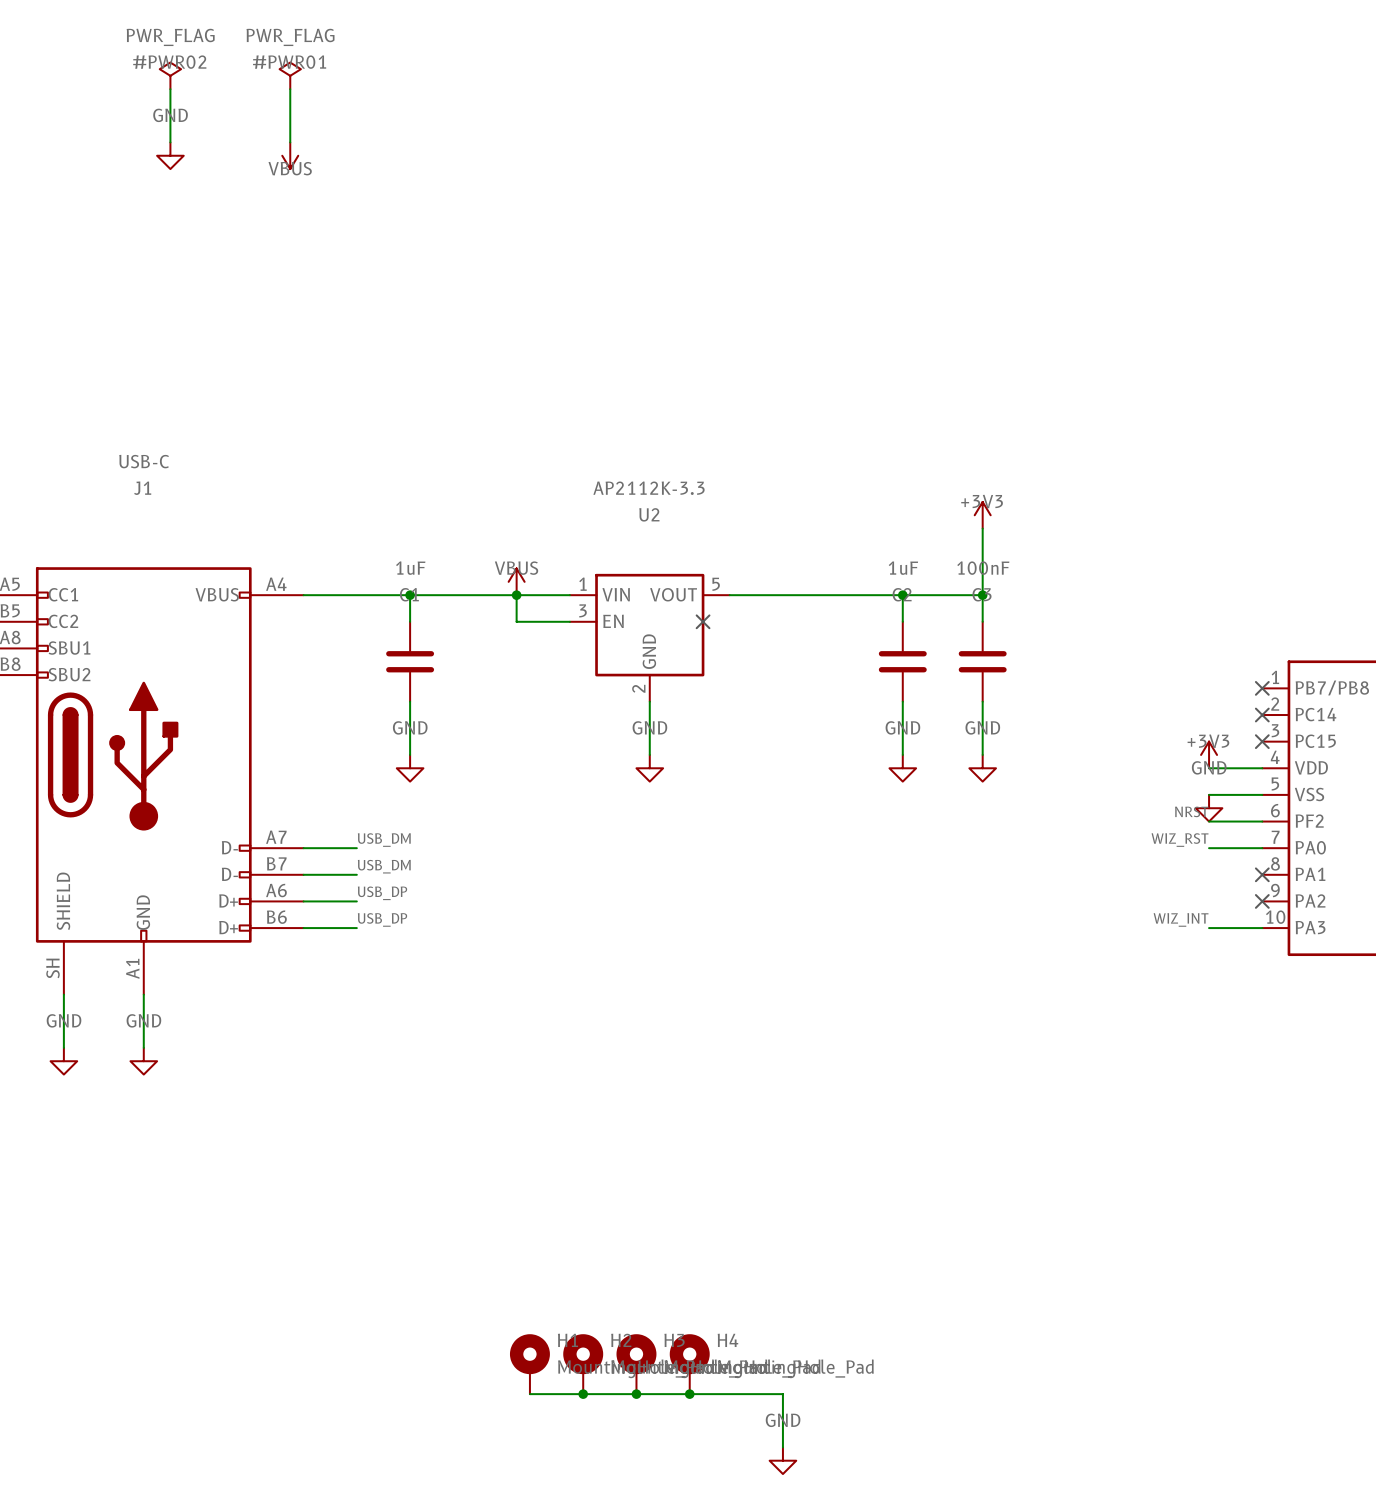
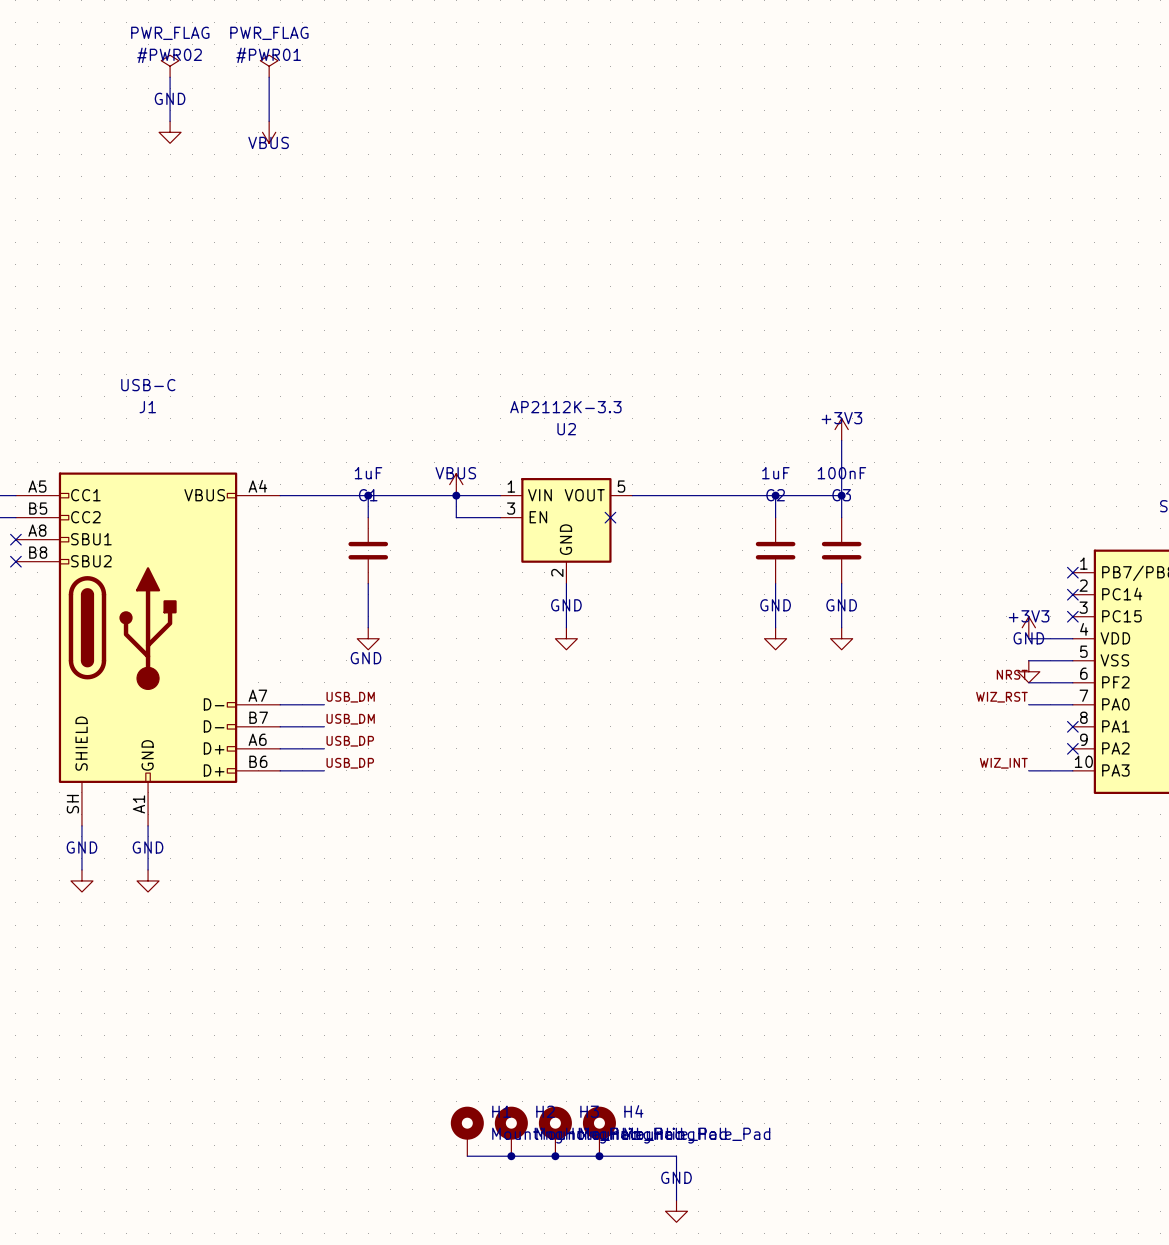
power symbol text position: GND (410, 727) -> GND (366, 658)

